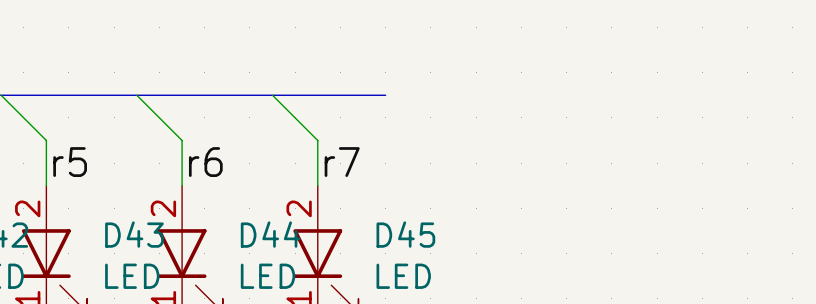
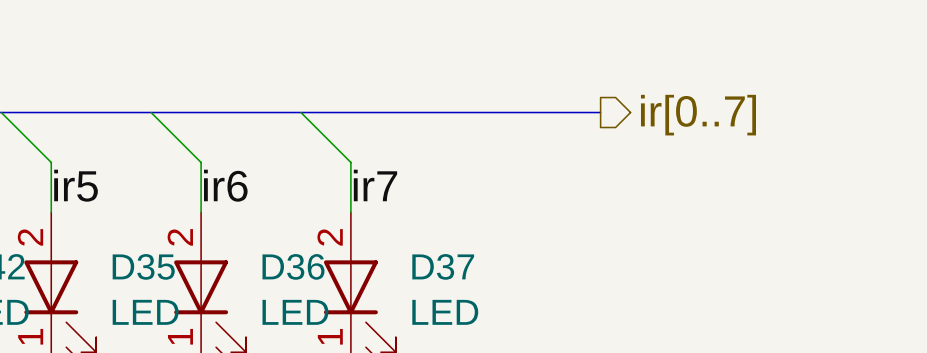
bus: none -> (425, 112) (600, 112)
hierarchical label: none -> ir[0..7] (698, 115)
label: r5 (70, 162) -> ir5 (76, 185)
label: r6 (205, 162) -> ir6 (225, 185)
label: r7 (342, 162) -> ir7 (375, 185)
D43 name: D43 (134, 234) -> D35 (143, 266)
D44 name: D44 (270, 234) -> D36 (293, 266)
D45 name: D45 (405, 234) -> D37 (443, 266)

